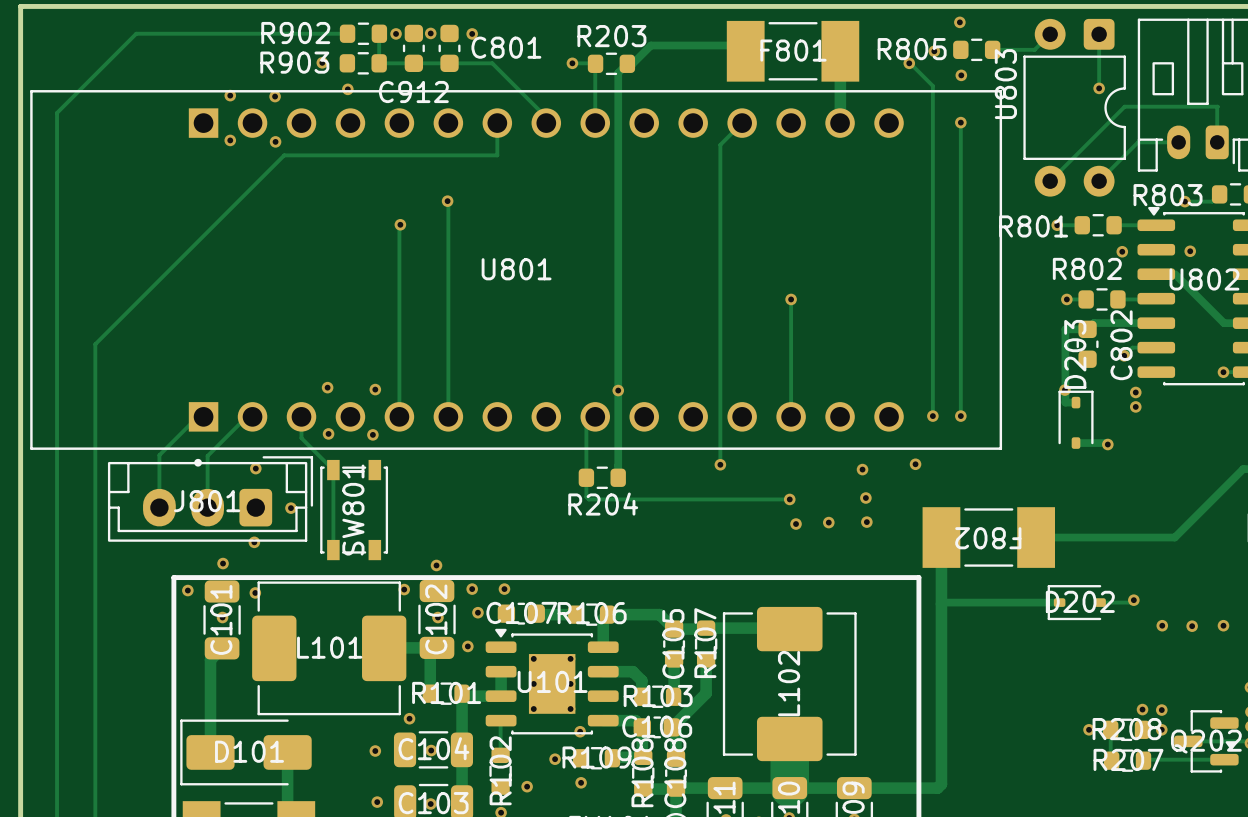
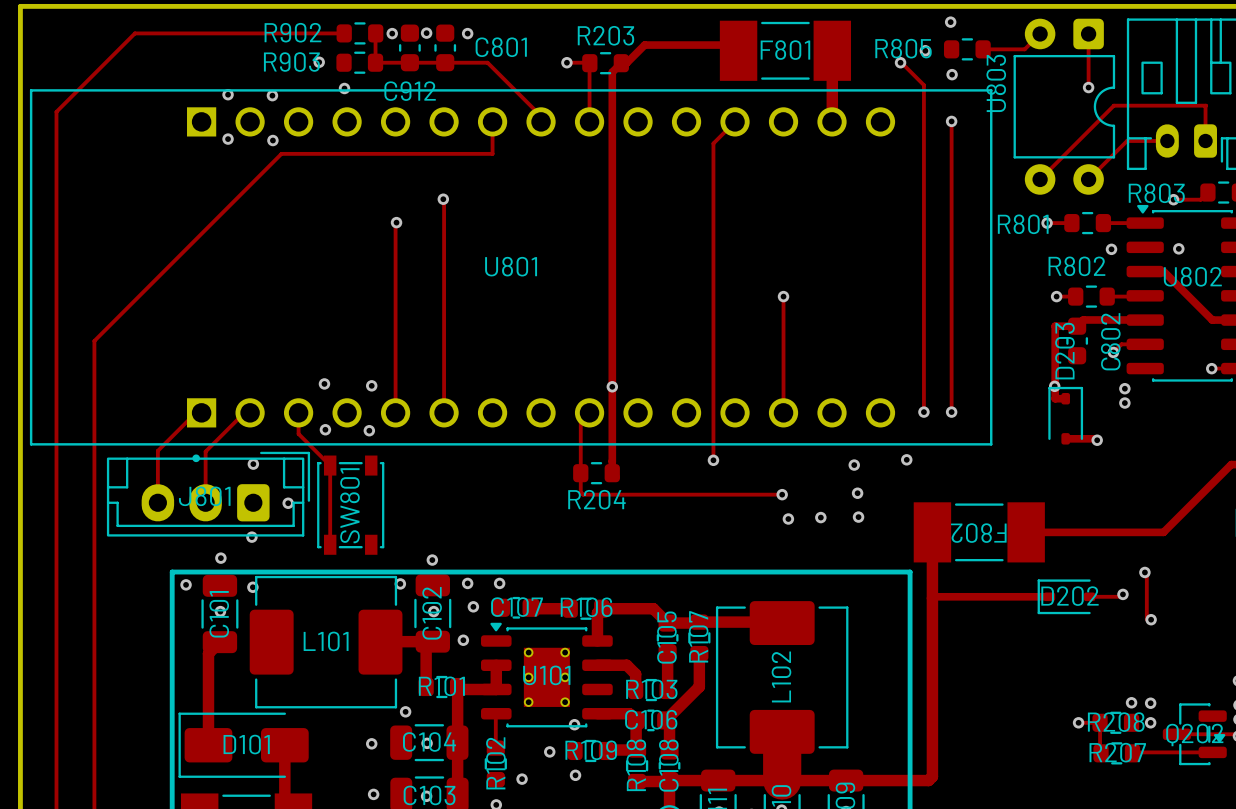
track: none -> (1144, 572) (1146, 574) (1146, 619)
via: none -> (1144, 572)
via: (1223, 625) -> none
via: (1192, 626) -> none

